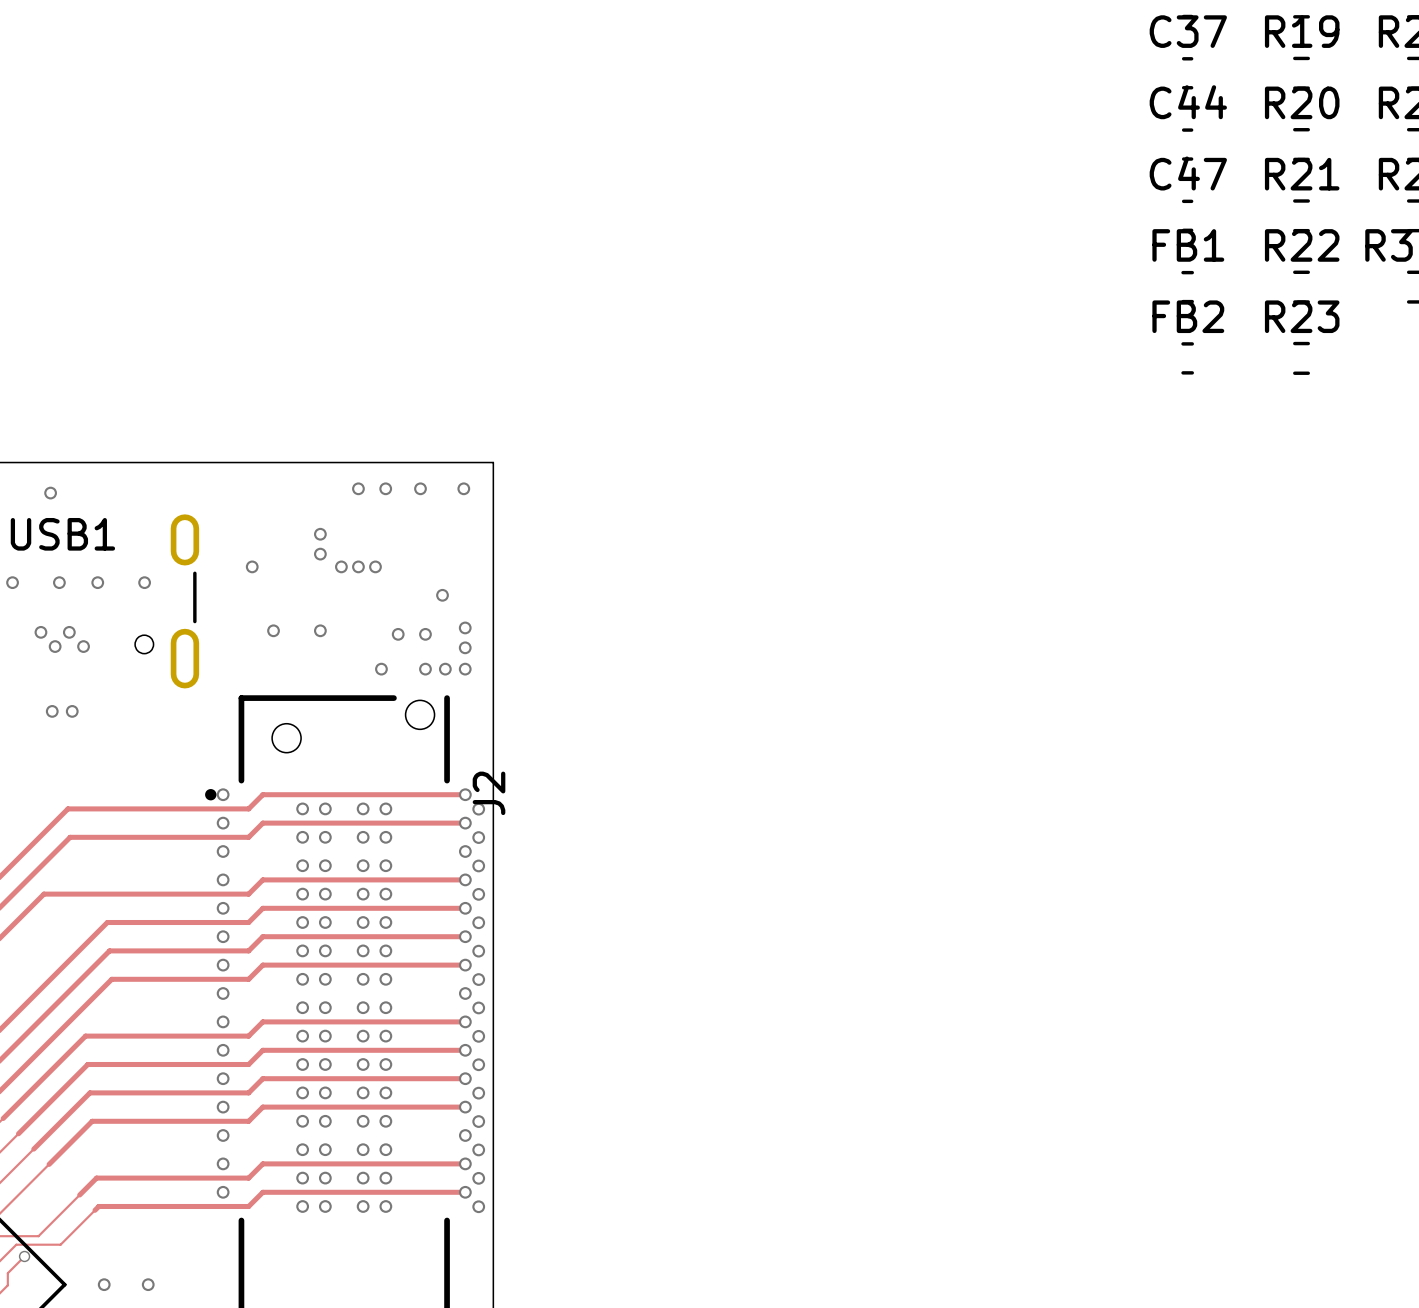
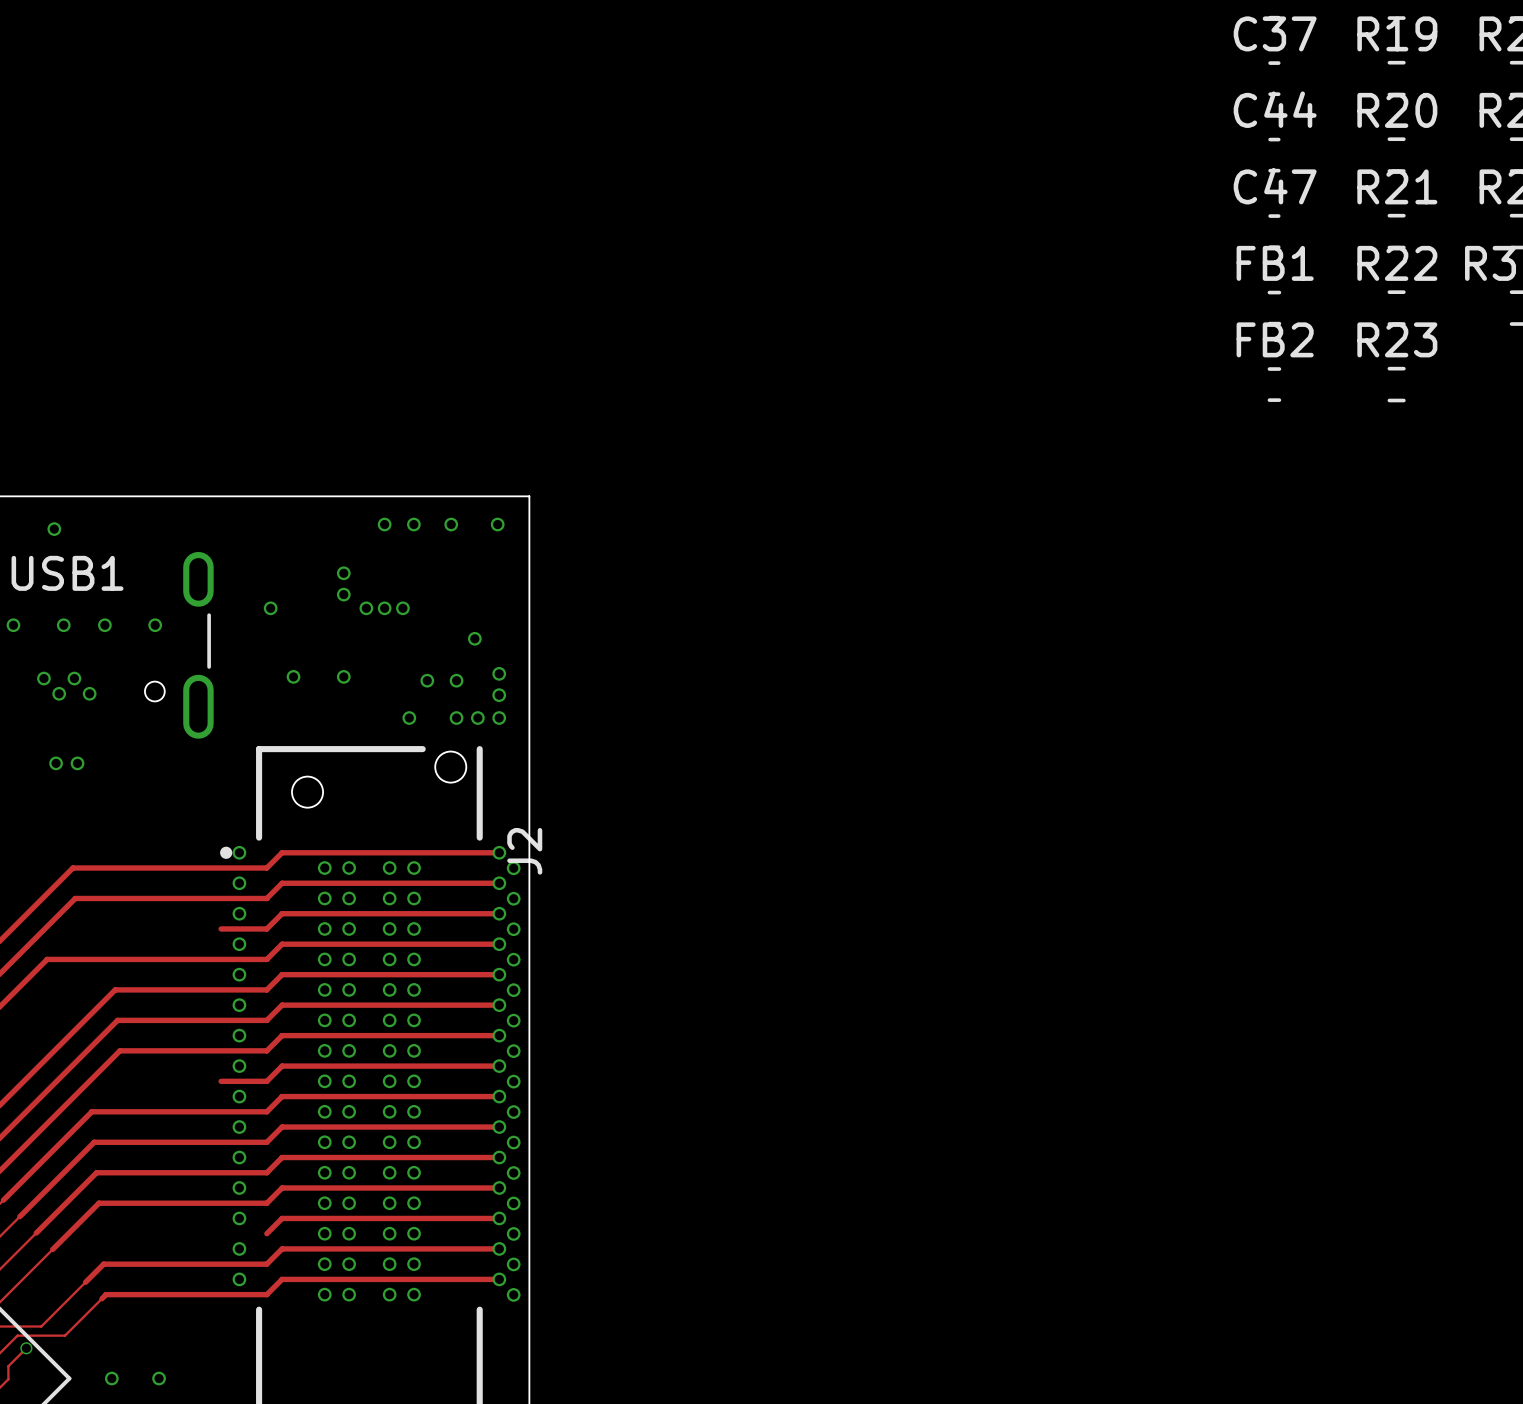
track: none -> (499, 913) (282, 913) (266, 928) (221, 928)
track: none -> (499, 1066) (282, 1066) (266, 1081) (221, 1081)
track: none -> (499, 1218) (282, 1218) (266, 1233)

